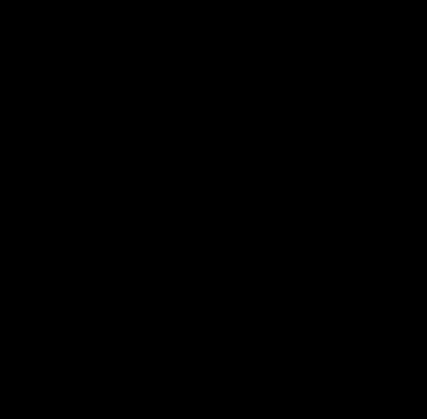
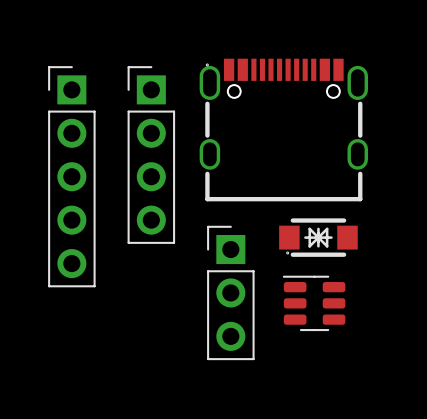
part: none -> (283, 130)
part: none -> (151, 155)
part: none -> (71, 176)
part: none -> (318, 237)
part: none -> (230, 292)
part: none -> (314, 303)

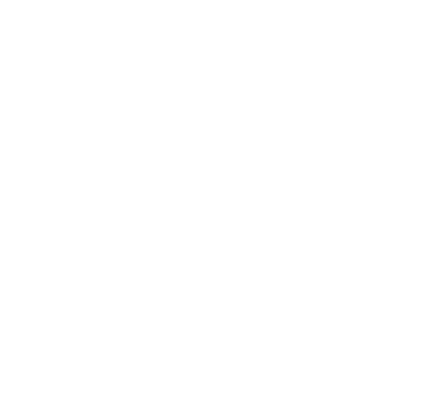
part: (283, 130) -> none
part: (151, 155) -> none
part: (71, 176) -> none
part: (318, 237) -> none
part: (230, 292) -> none
part: (314, 303) -> none

